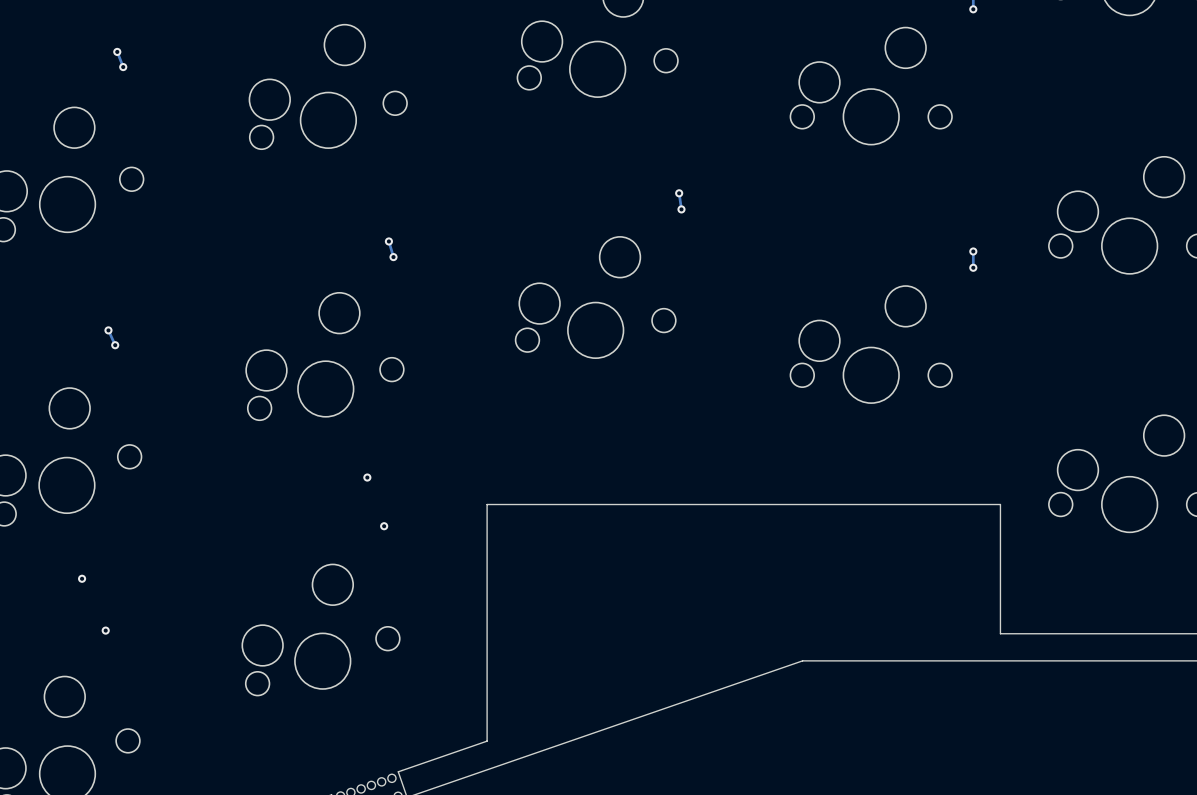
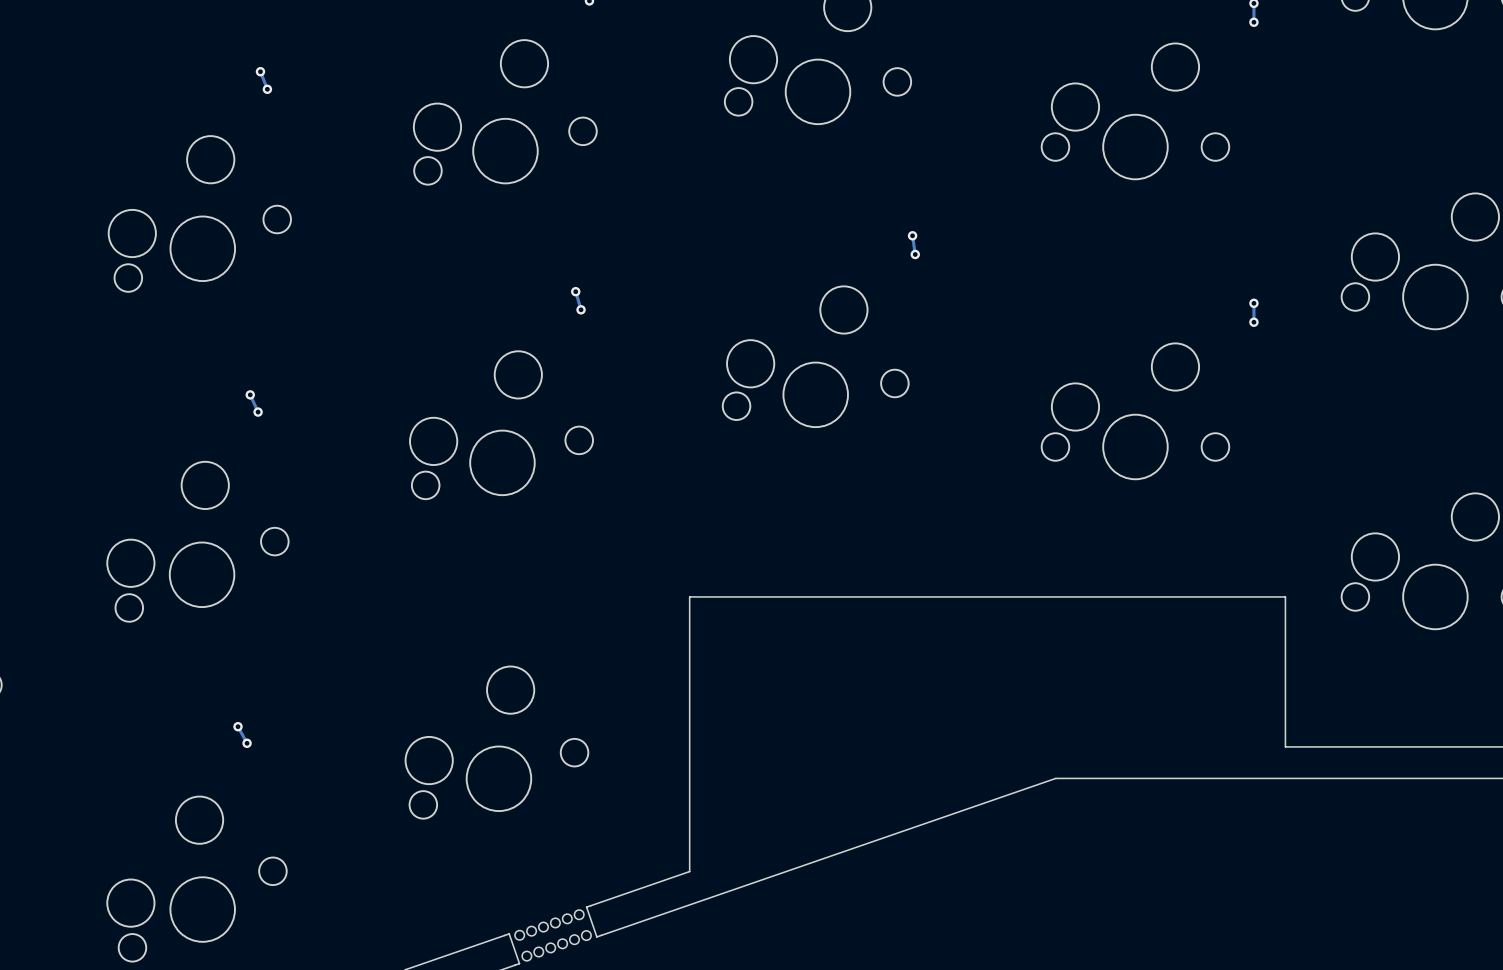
via: (367, 477) -> none
via: (384, 526) -> none
via position: (82, 578) -> (238, 726)
track: none -> (238, 726) (247, 743)

